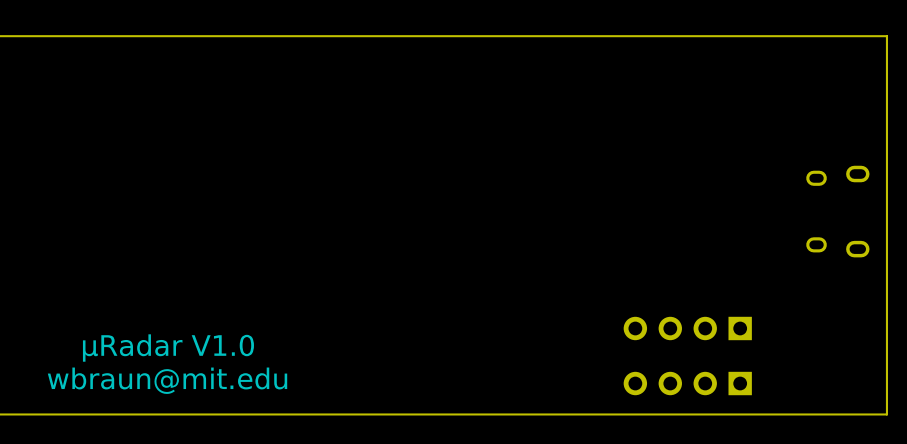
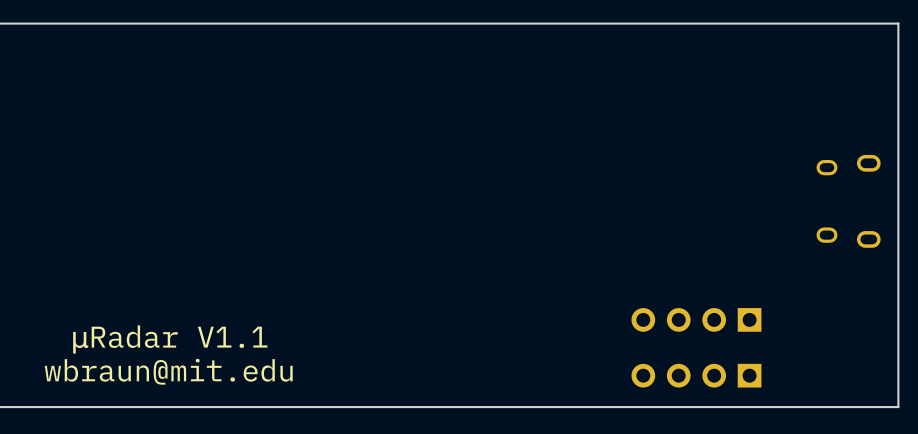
text: μRadar V1.0 (168, 348) -> μRadar V1.1 (170, 339)

